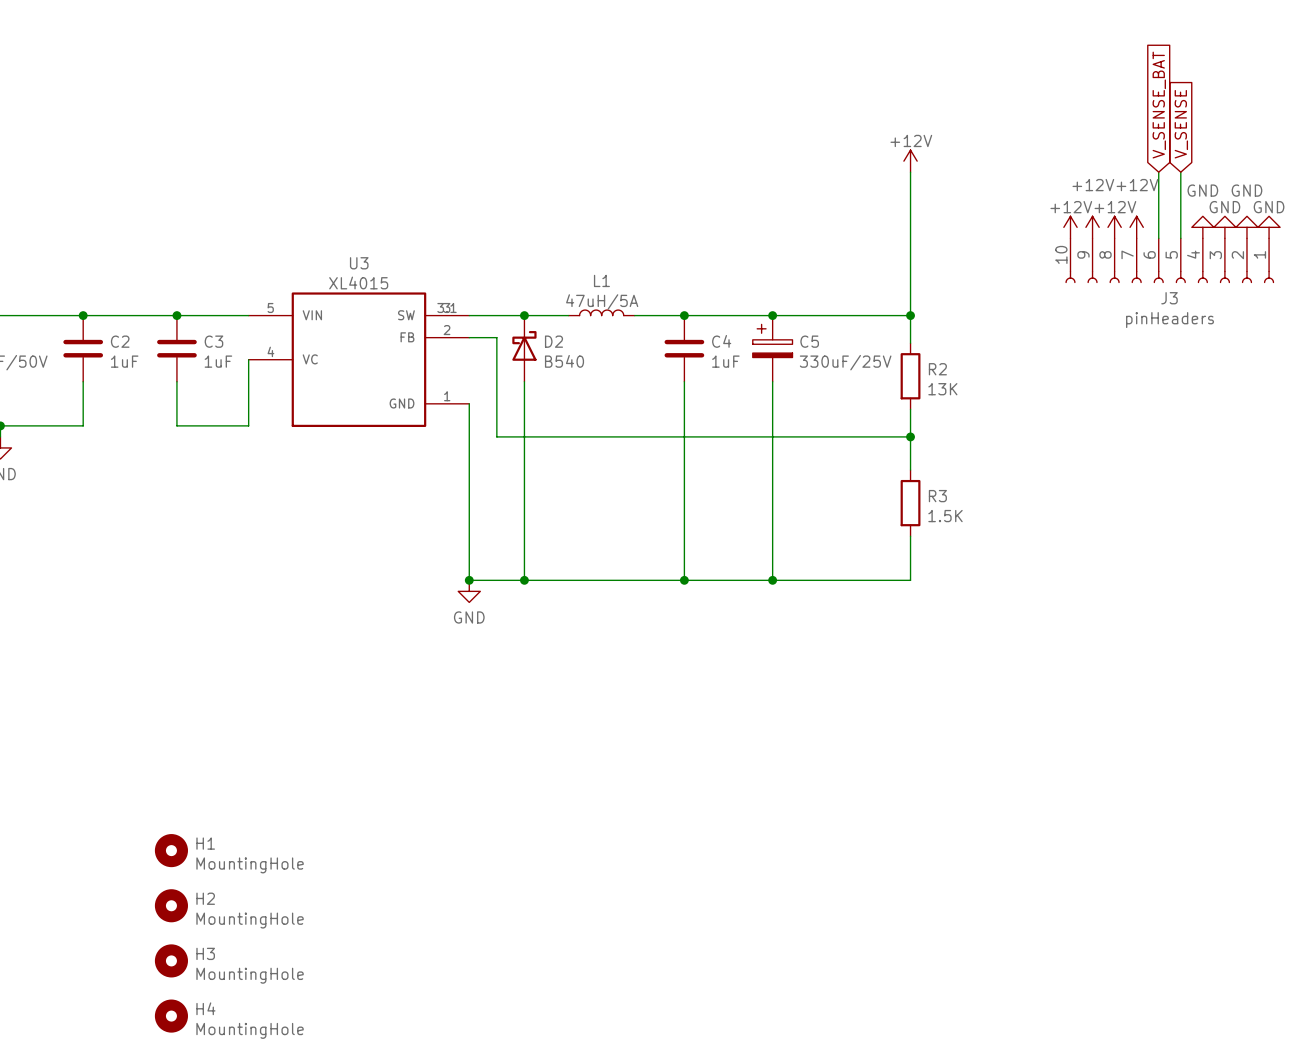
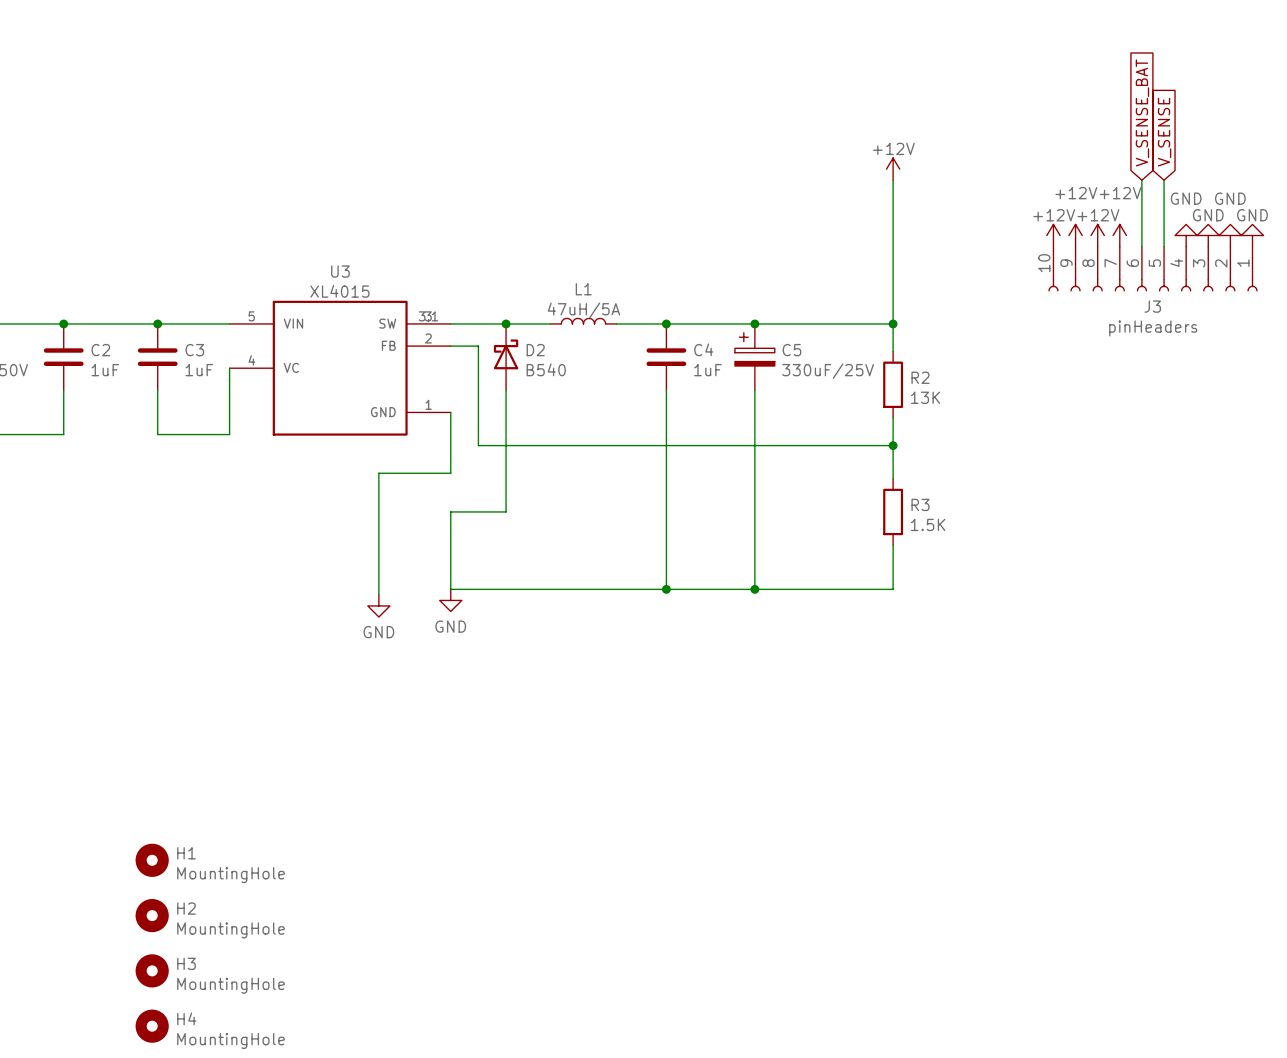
wire: (469, 464) (469, 503) -> (506, 511) (450, 511)
wire: none -> (450, 473) (378, 473) (378, 594)
wire: (524, 503) (524, 580) -> none
junction: (469, 580) -> none
junction: (524, 580) -> none
power symbol: none -> GND (378, 605)

